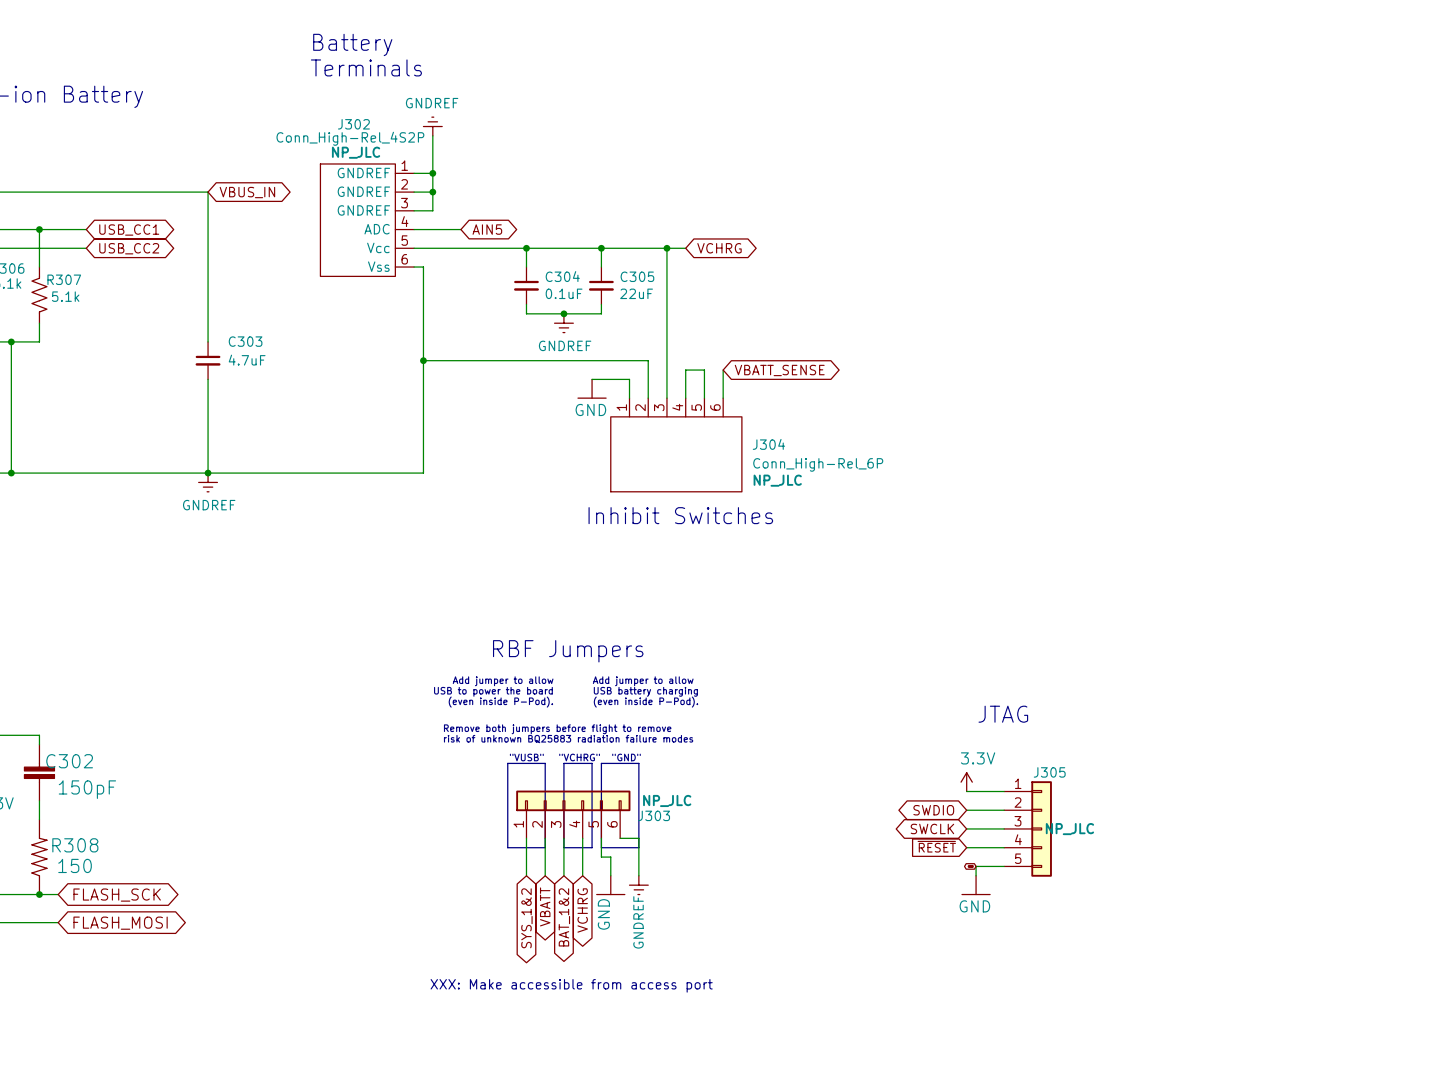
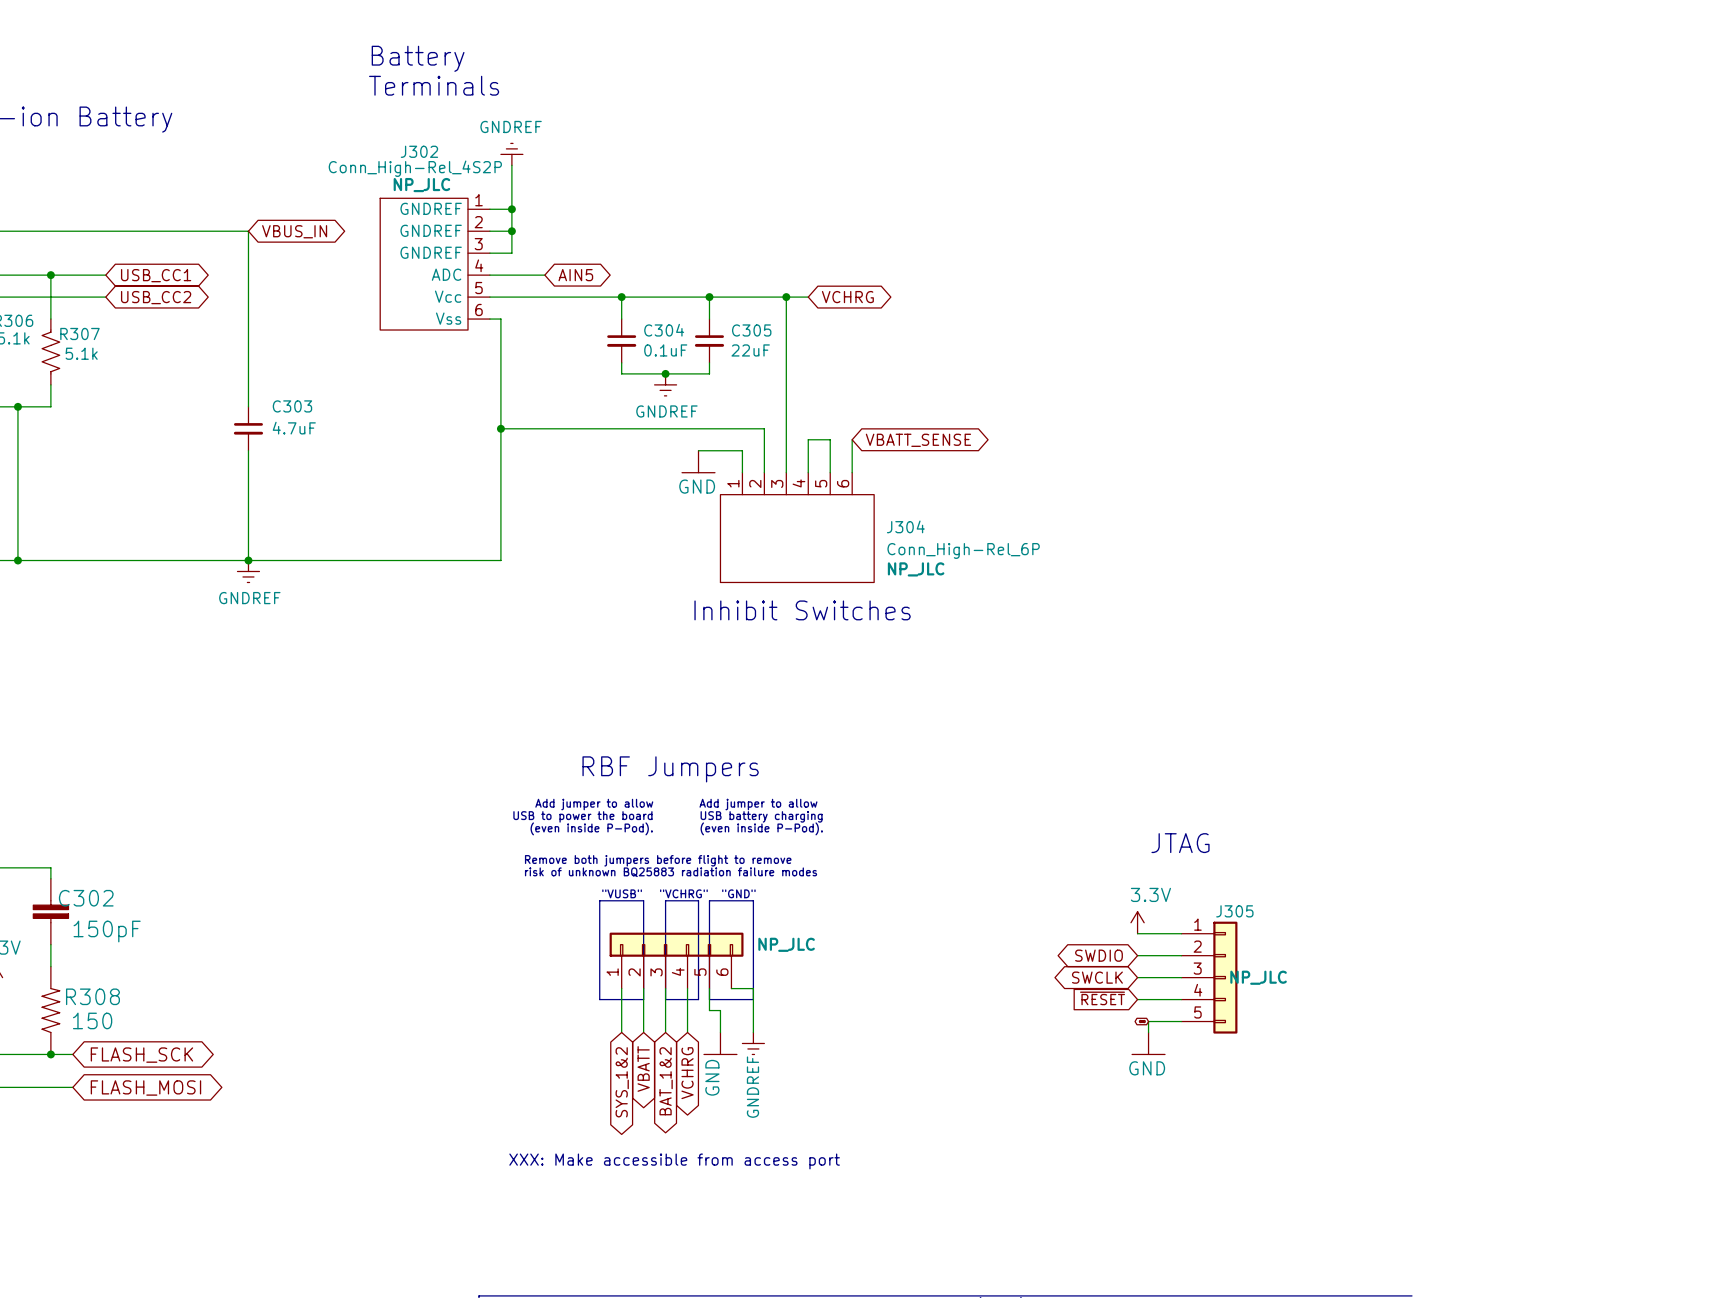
J303 name: J303 (654, 815) -> none

